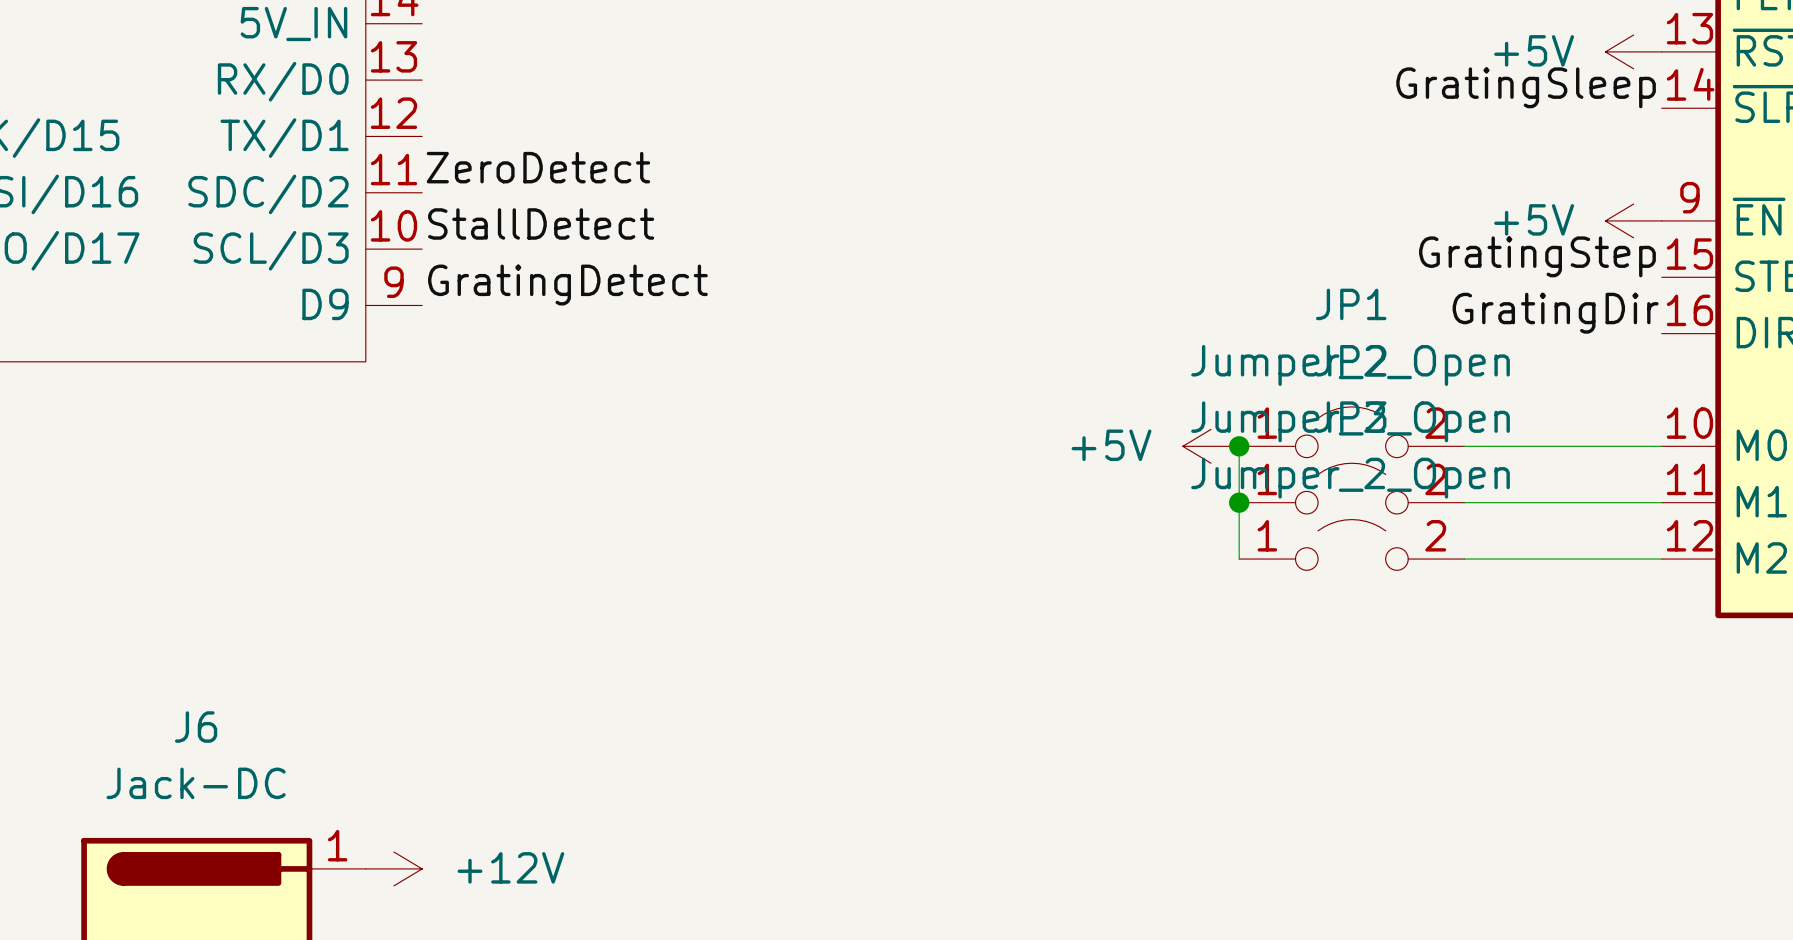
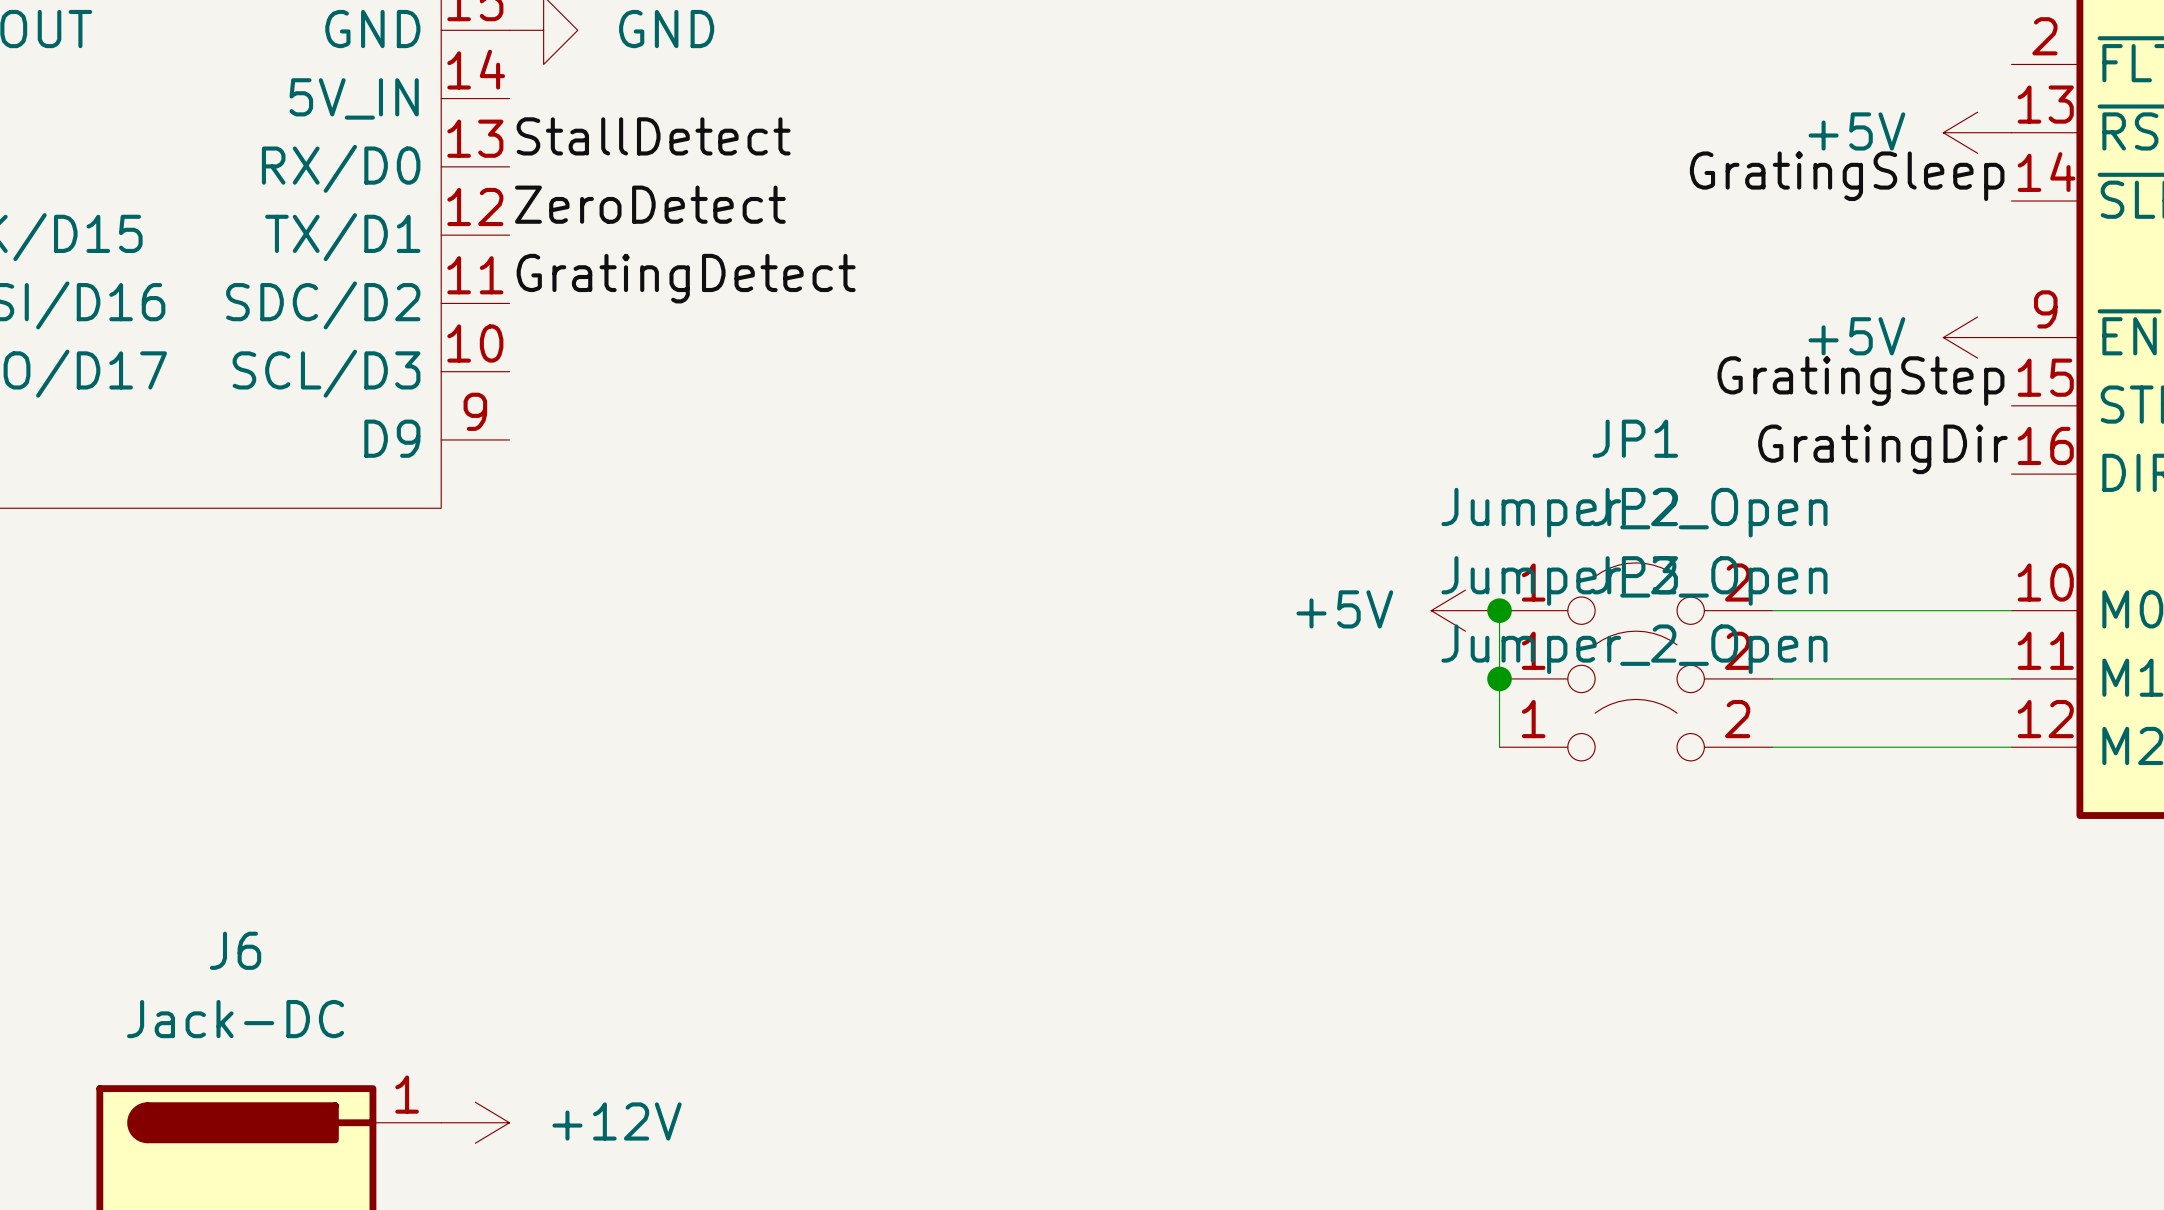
label: none -> ZeroDetect (650, 204)
label: ZeroDetect (538, 167) -> GratingDetect (686, 278)
label position: StallDetect (541, 223) -> StallDetect (653, 136)
label: GratingDetect (567, 285) -> none

